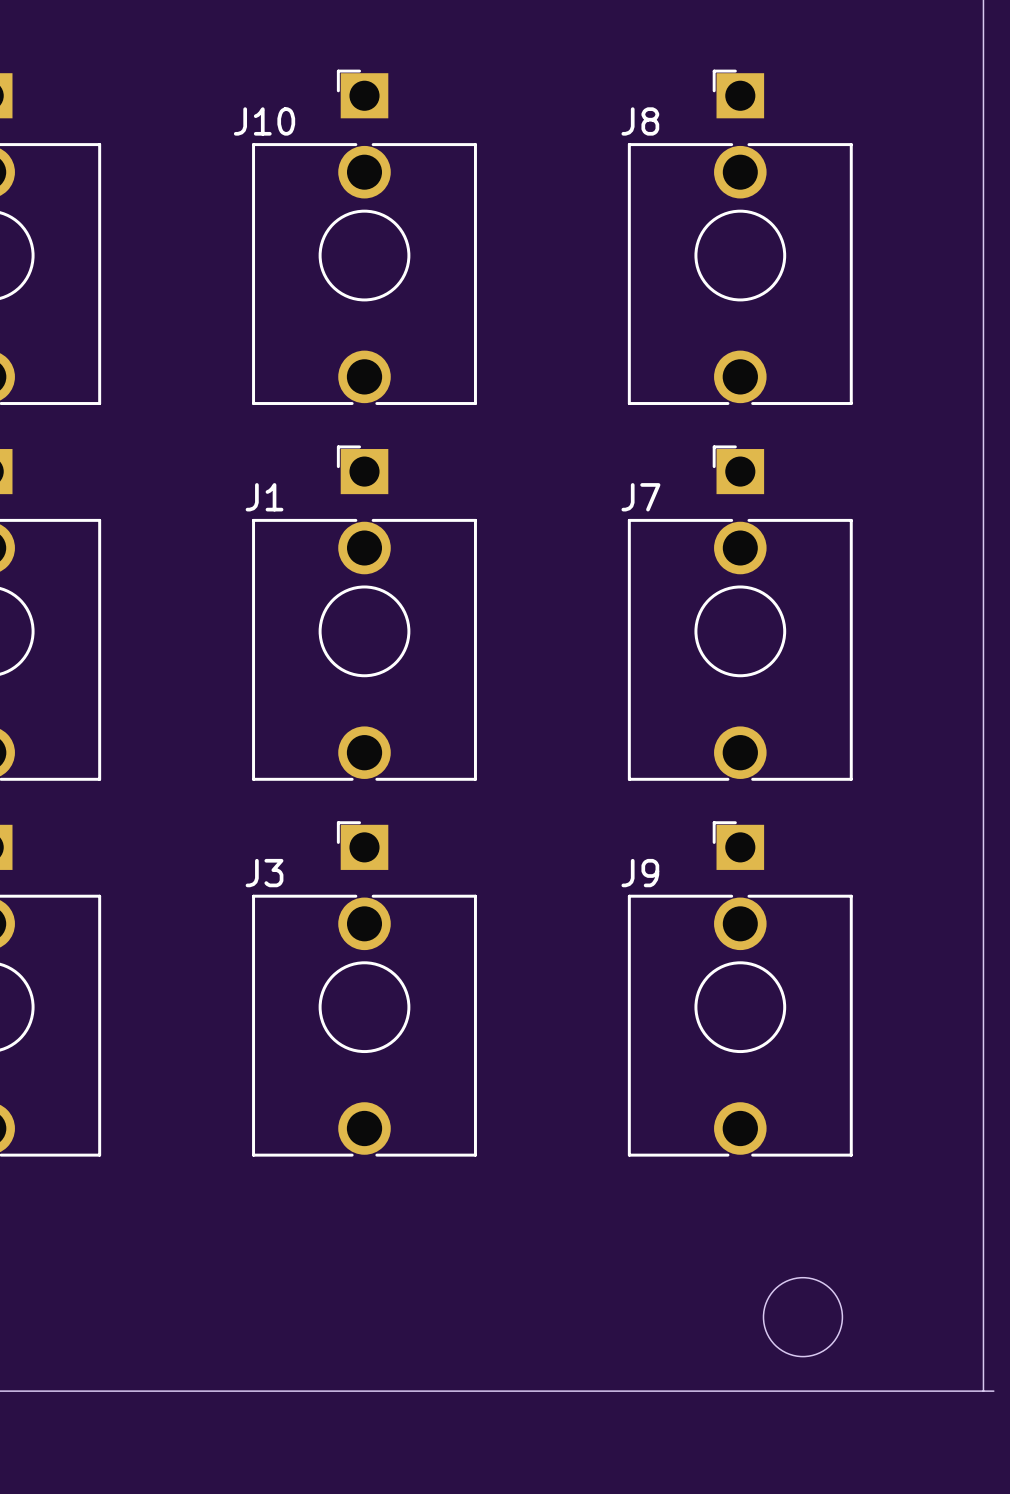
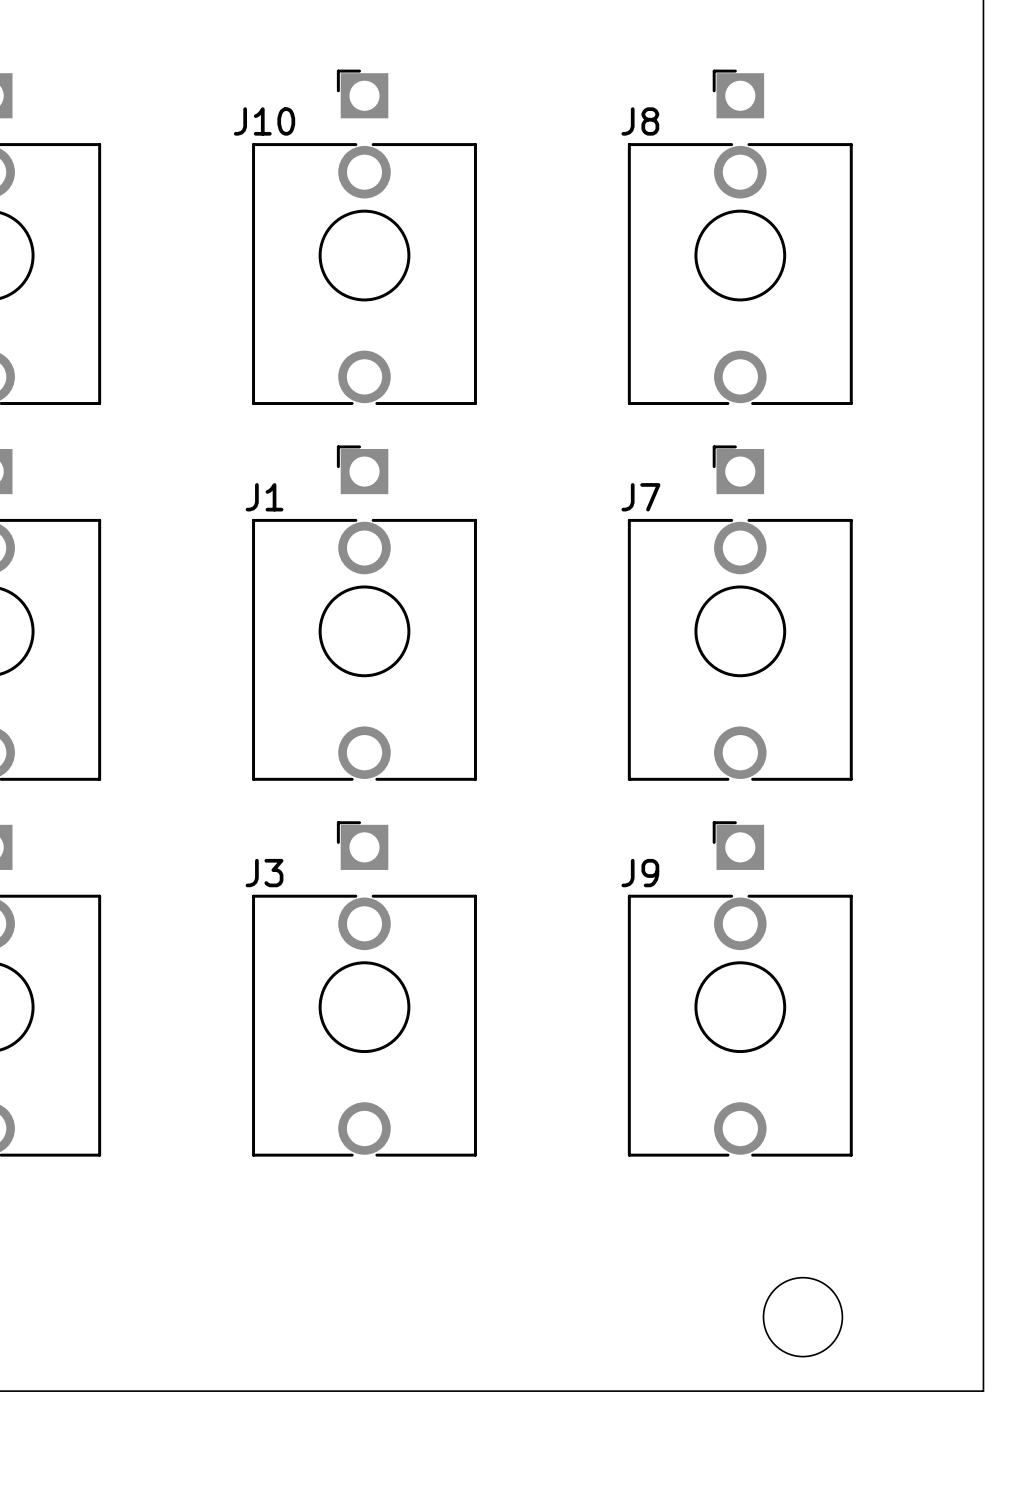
board edge: (983, 1391) (993, 1391) -> none

